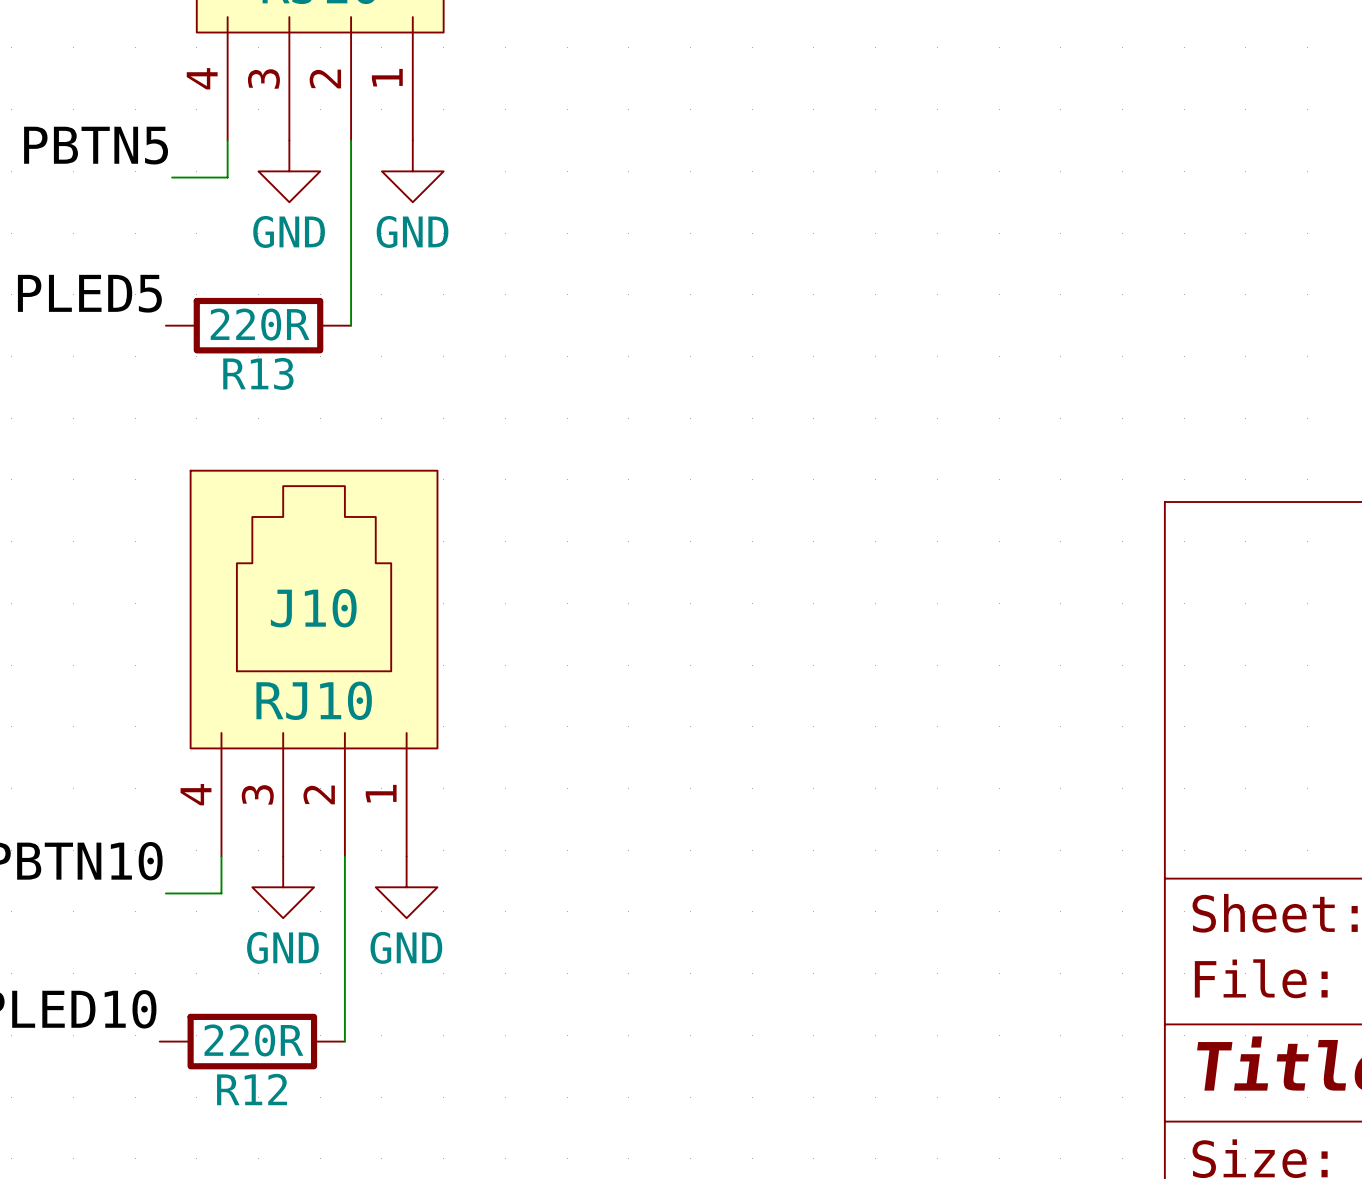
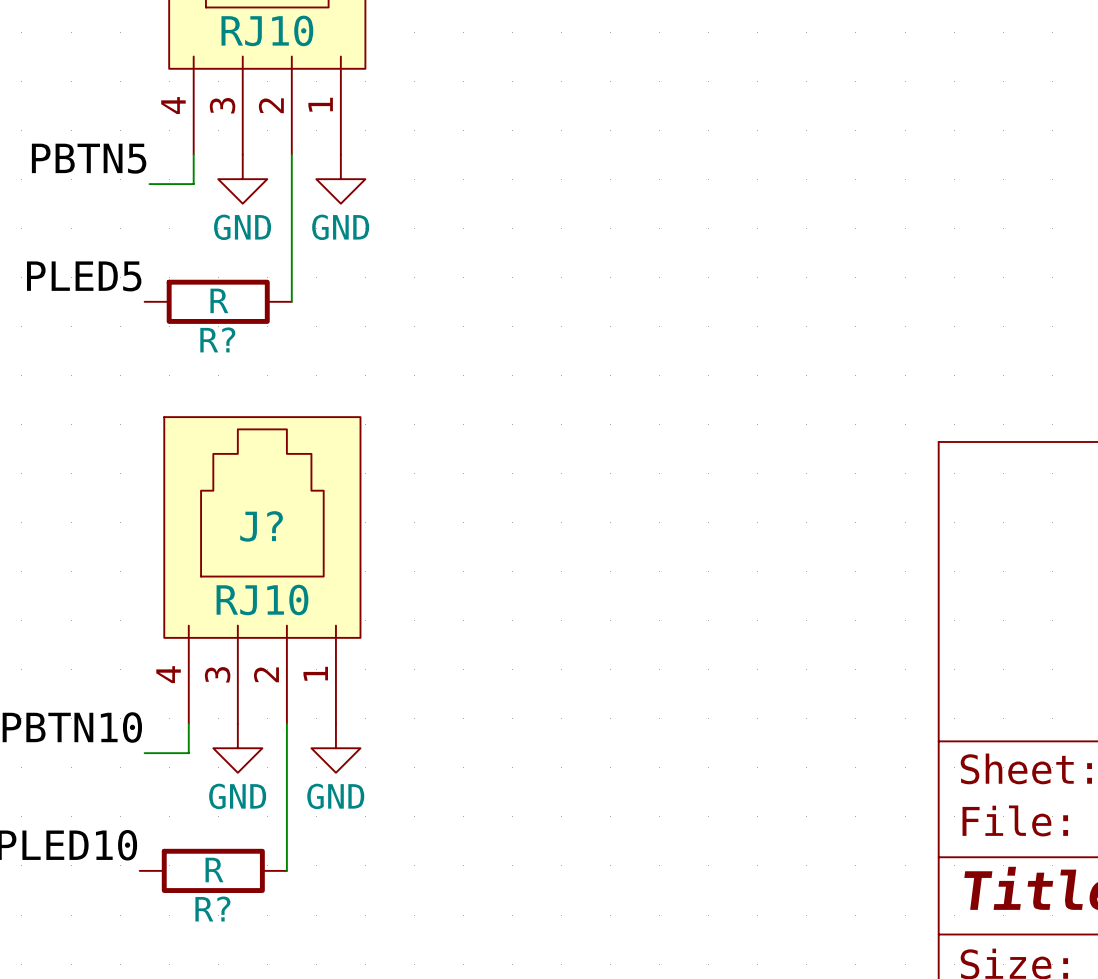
R13 value: 220R (260, 324) -> R (219, 300)
R13 name: R13 (258, 373) -> R? (217, 339)
J10 name: J10 (313, 608) -> J? (261, 526)
R12 value: 220R (253, 1040) -> R (214, 869)
R12 name: R12 (252, 1089) -> R? (212, 909)

